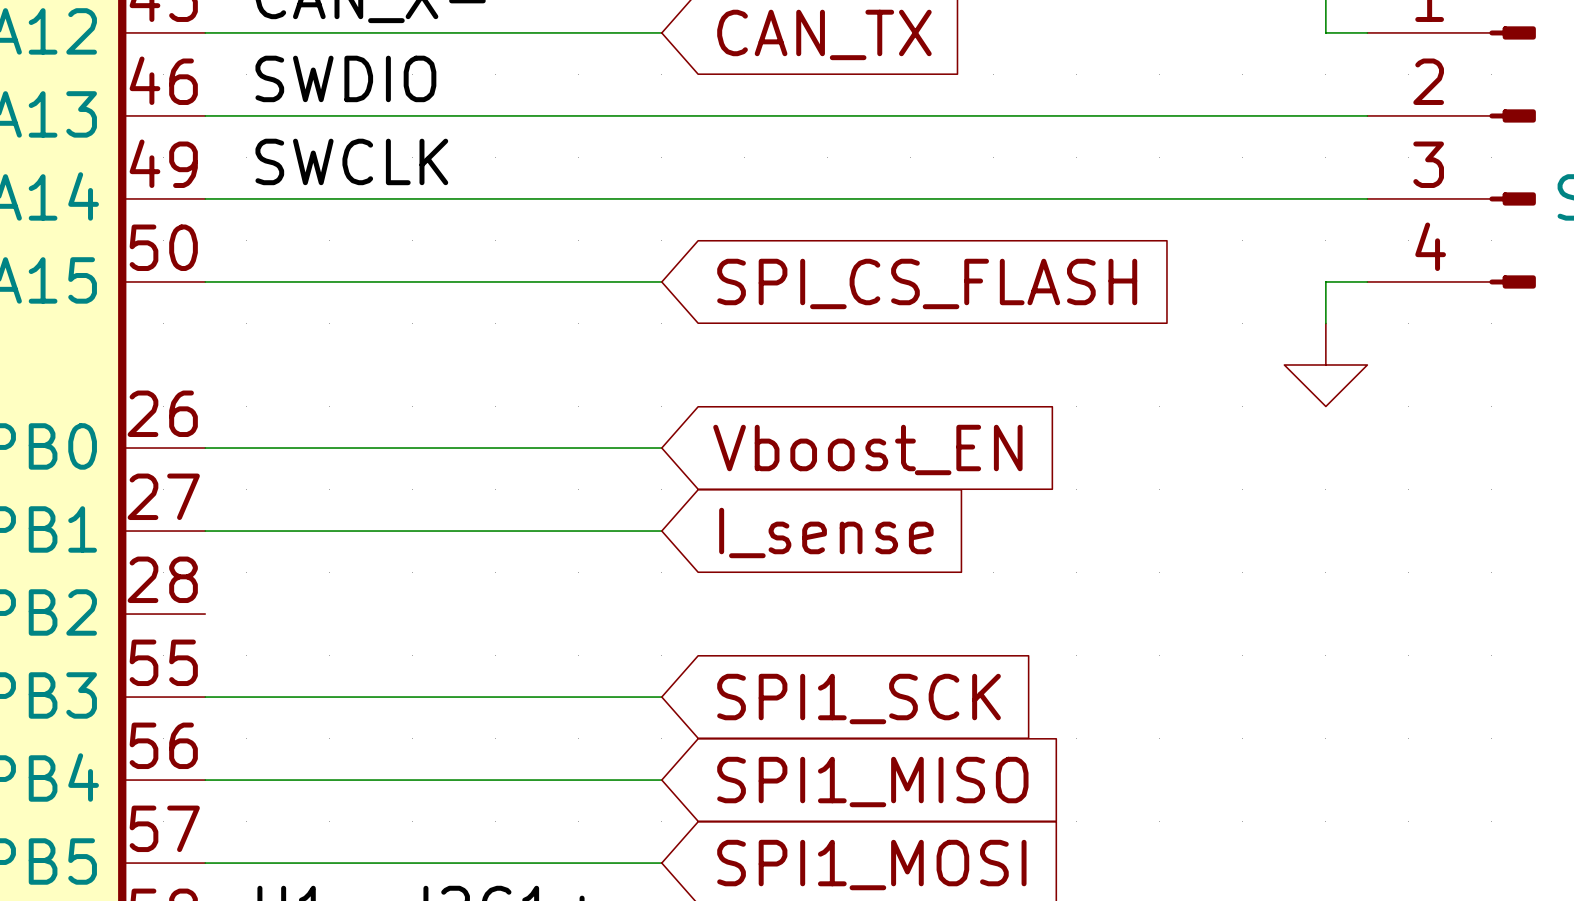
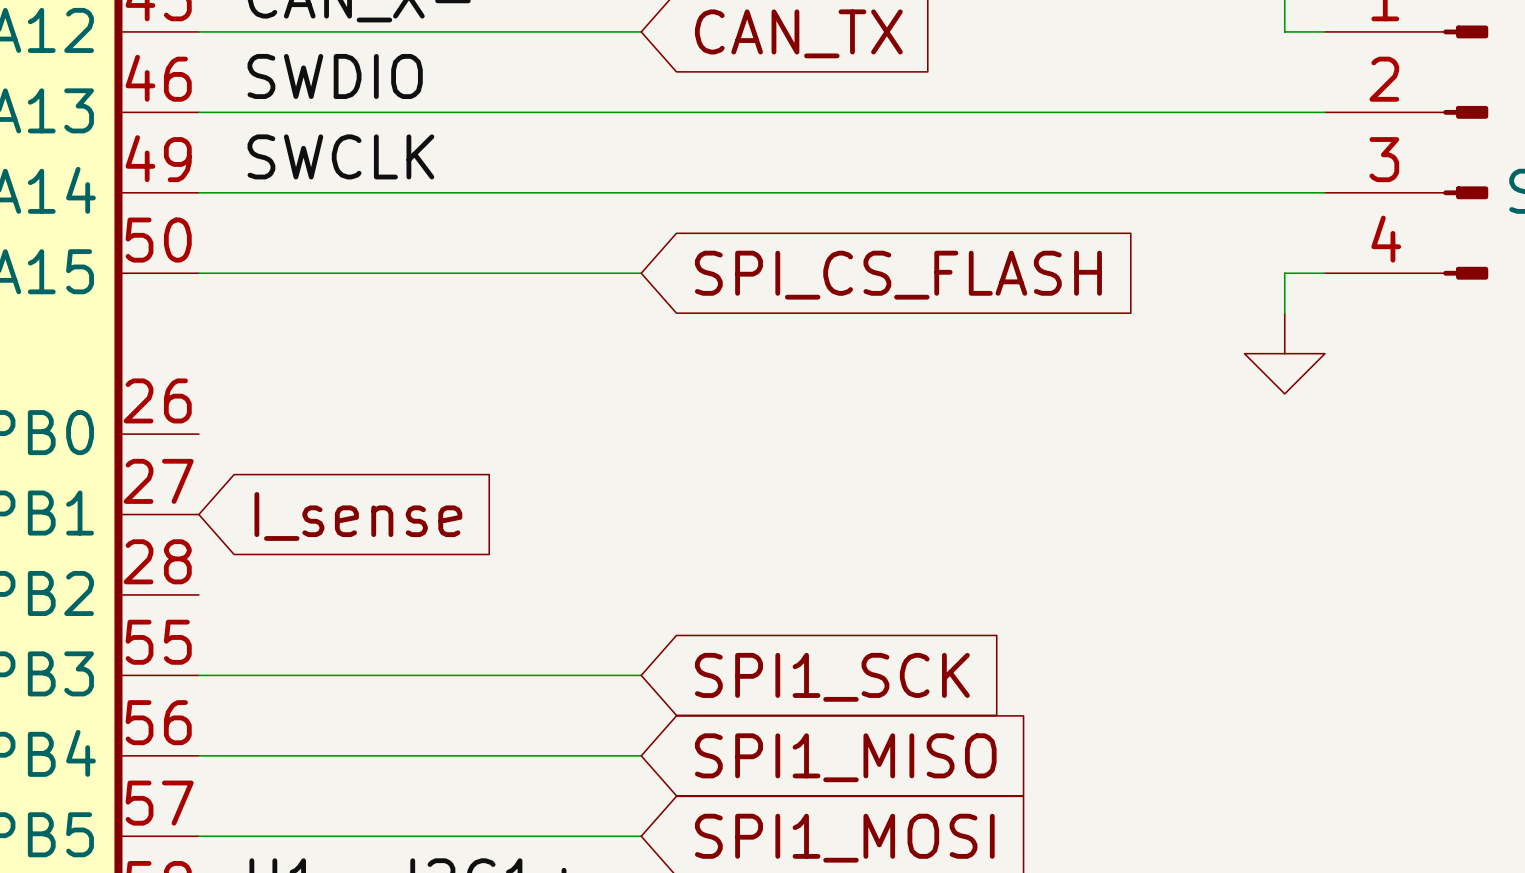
wire: (205, 448) (661, 448) -> none
global label: Vboost_EN (867, 449) -> none
wire: (205, 531) (661, 531) -> none
global label position: I_sense (826, 532) -> I_sense (358, 516)

